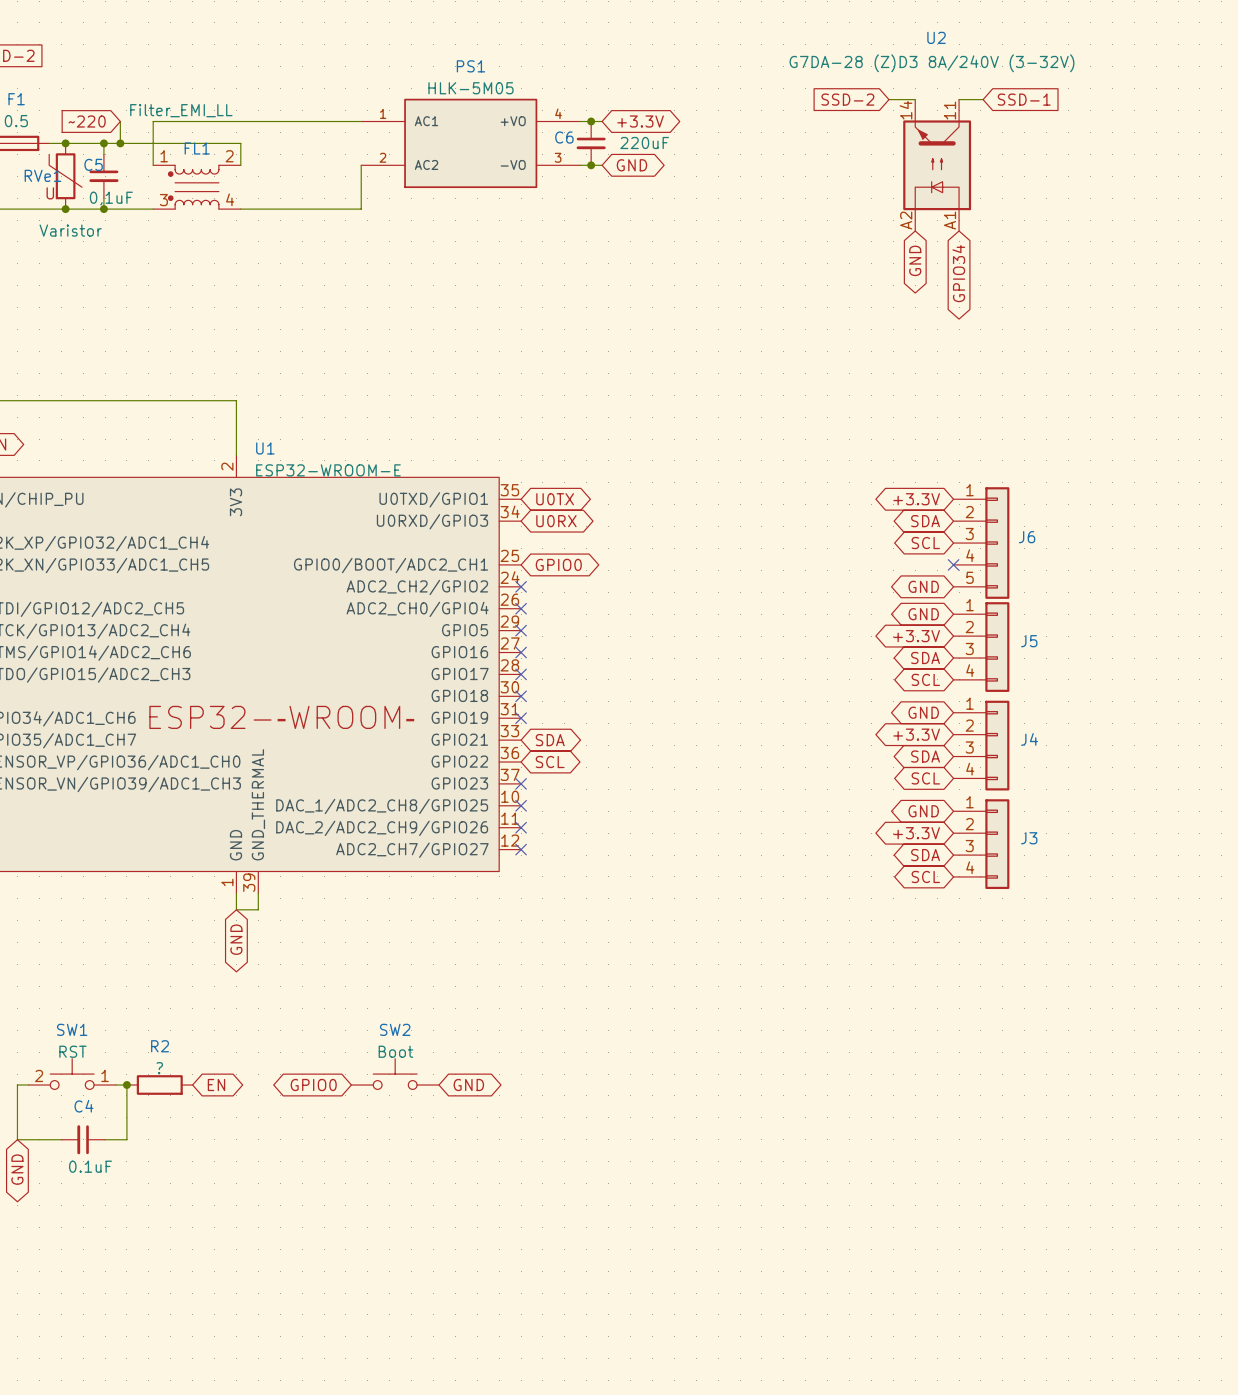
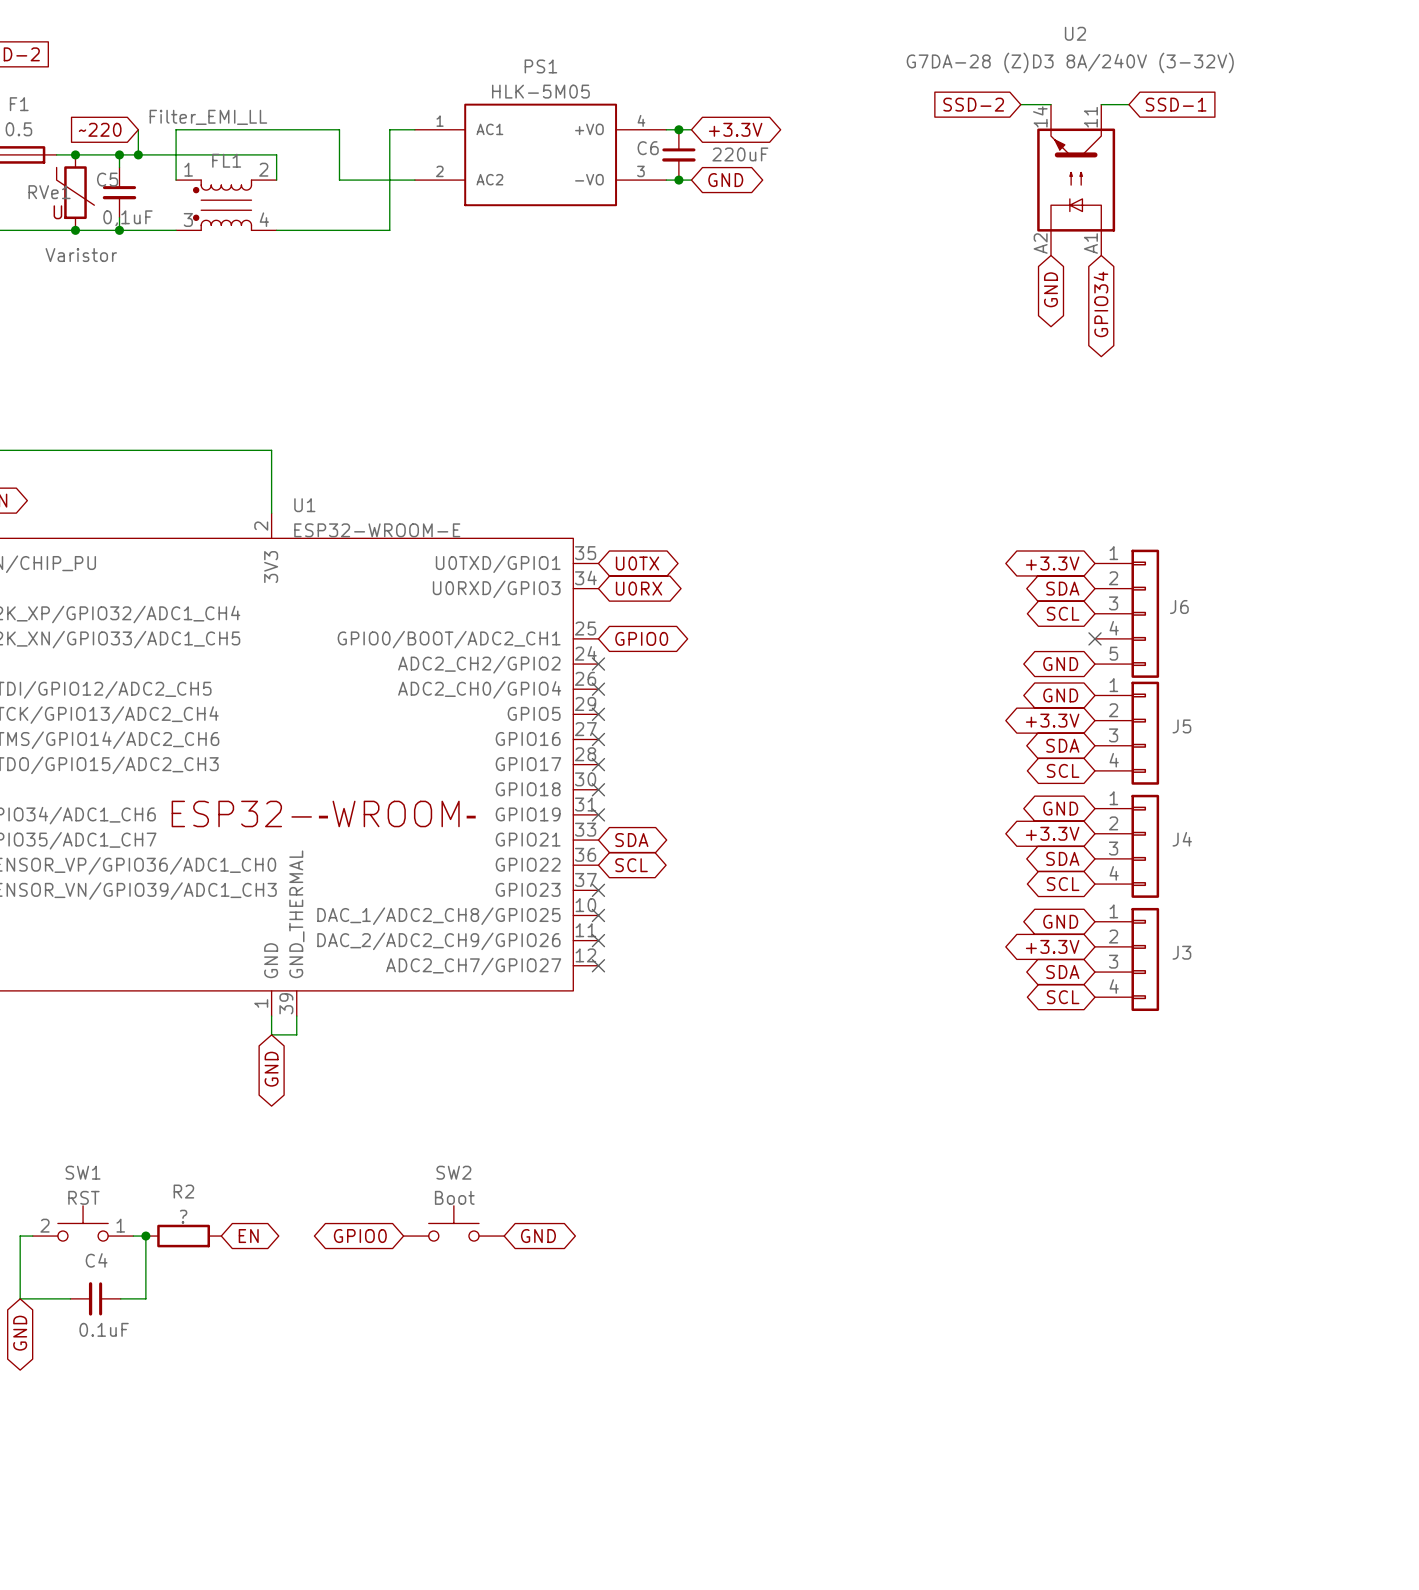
wire: (295, 121) (339, 121) -> (339, 129) (339, 180) (414, 180)
wire: (361, 165) (361, 209) (339, 209) -> (389, 129) (389, 230)

